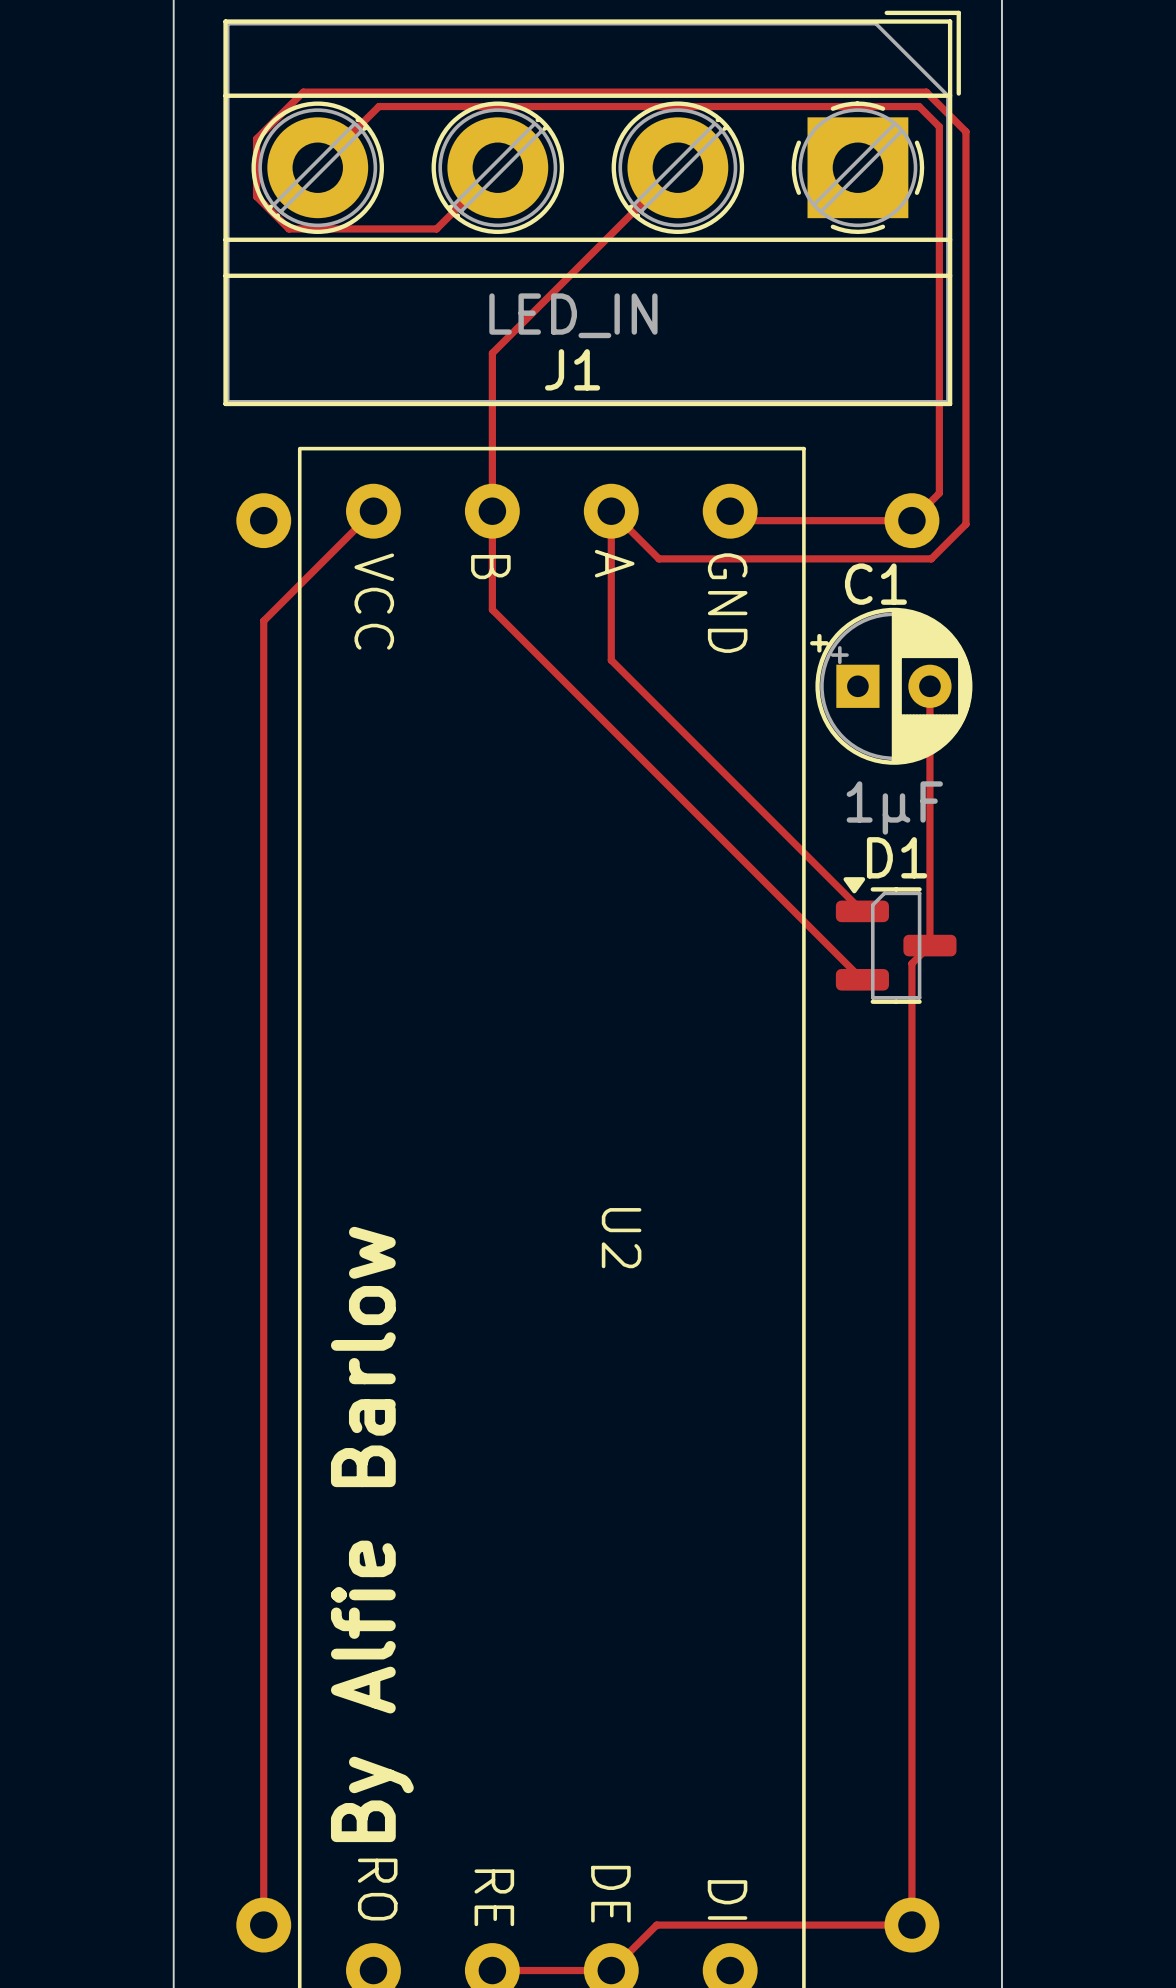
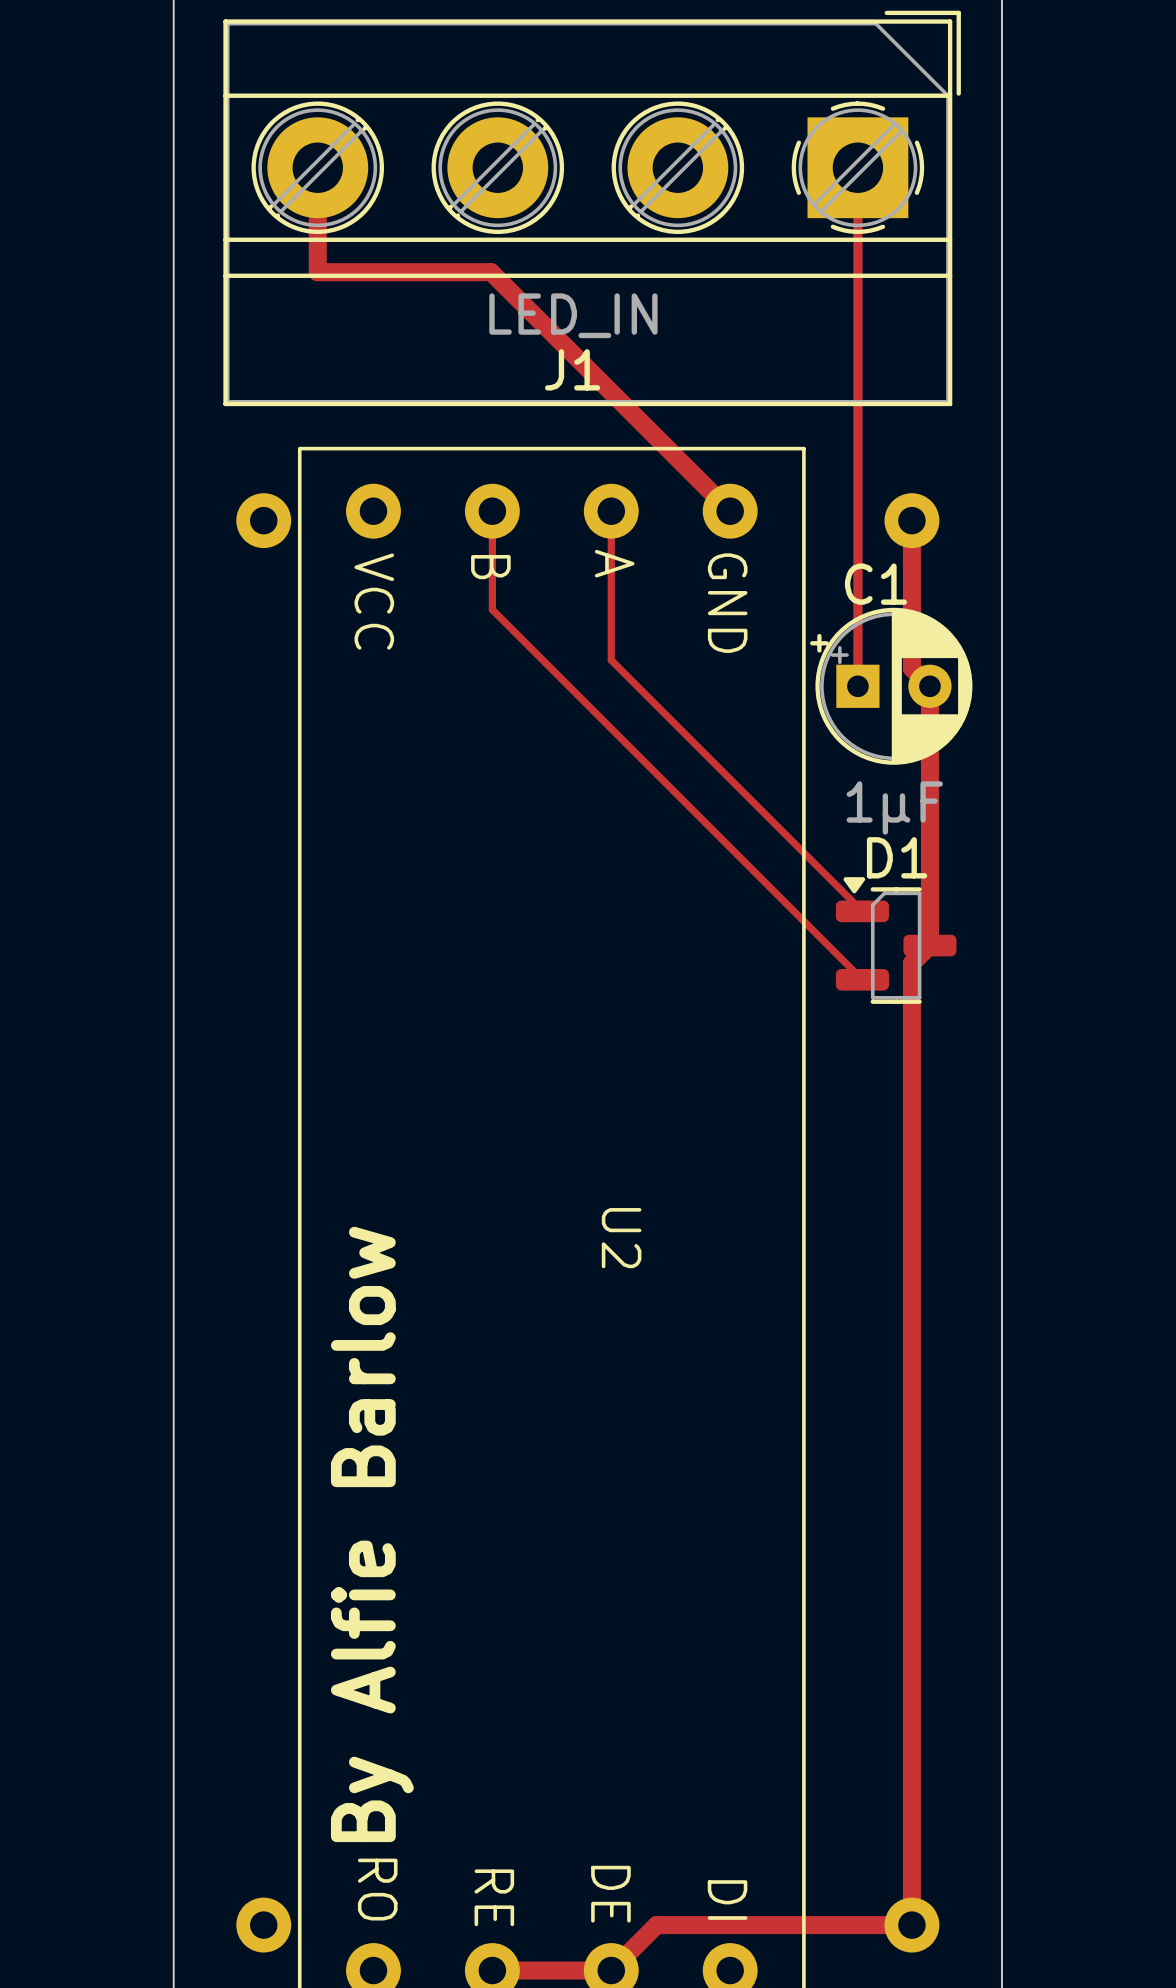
track: (317, 167) (378, 106) (919, 106) (939, 126) (939, 493) (911, 520) (739, 520) (730, 511) -> (317, 167) (317, 272) (491, 272) (730, 511)
track: (497, 167) (436, 228) (288, 228) (256, 196) (256, 138) (303, 92) (926, 92) (965, 131) (965, 524) (931, 558) (658, 558) (611, 511) -> none
track: (677, 167) (492, 353) (492, 511) -> none
track: none -> (857, 167) (857, 686)
track: (373, 511) (263, 620) (263, 1925) -> none
track: none -> (911, 520) (911, 668) (929, 686)
track width: thin (929, 686) (929, 945) (911, 963) (911, 1925) (656, 1925) (611, 1970) (492, 1970) -> thick (929, 686) (929, 945) (911, 963) (911, 1925) (656, 1925) (611, 1970) (492, 1970)

